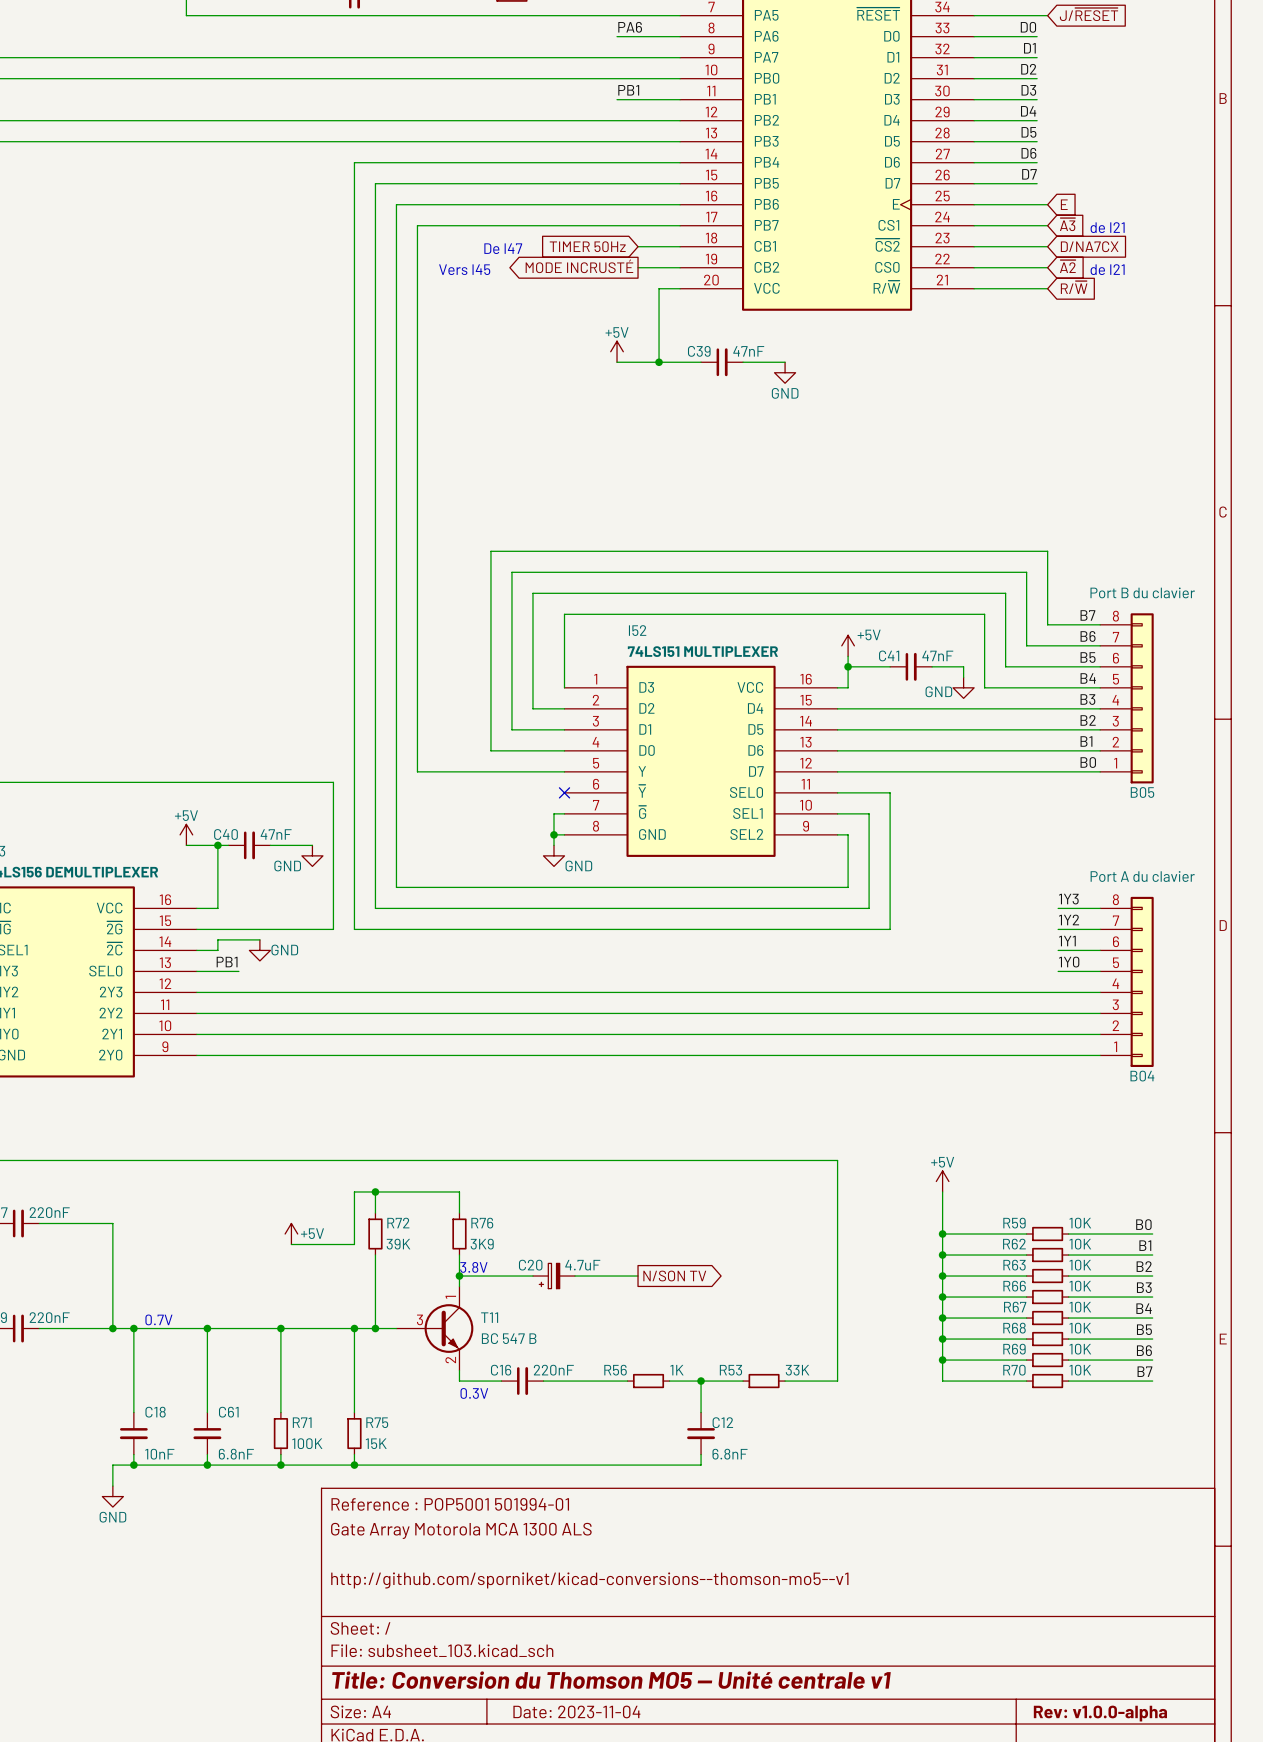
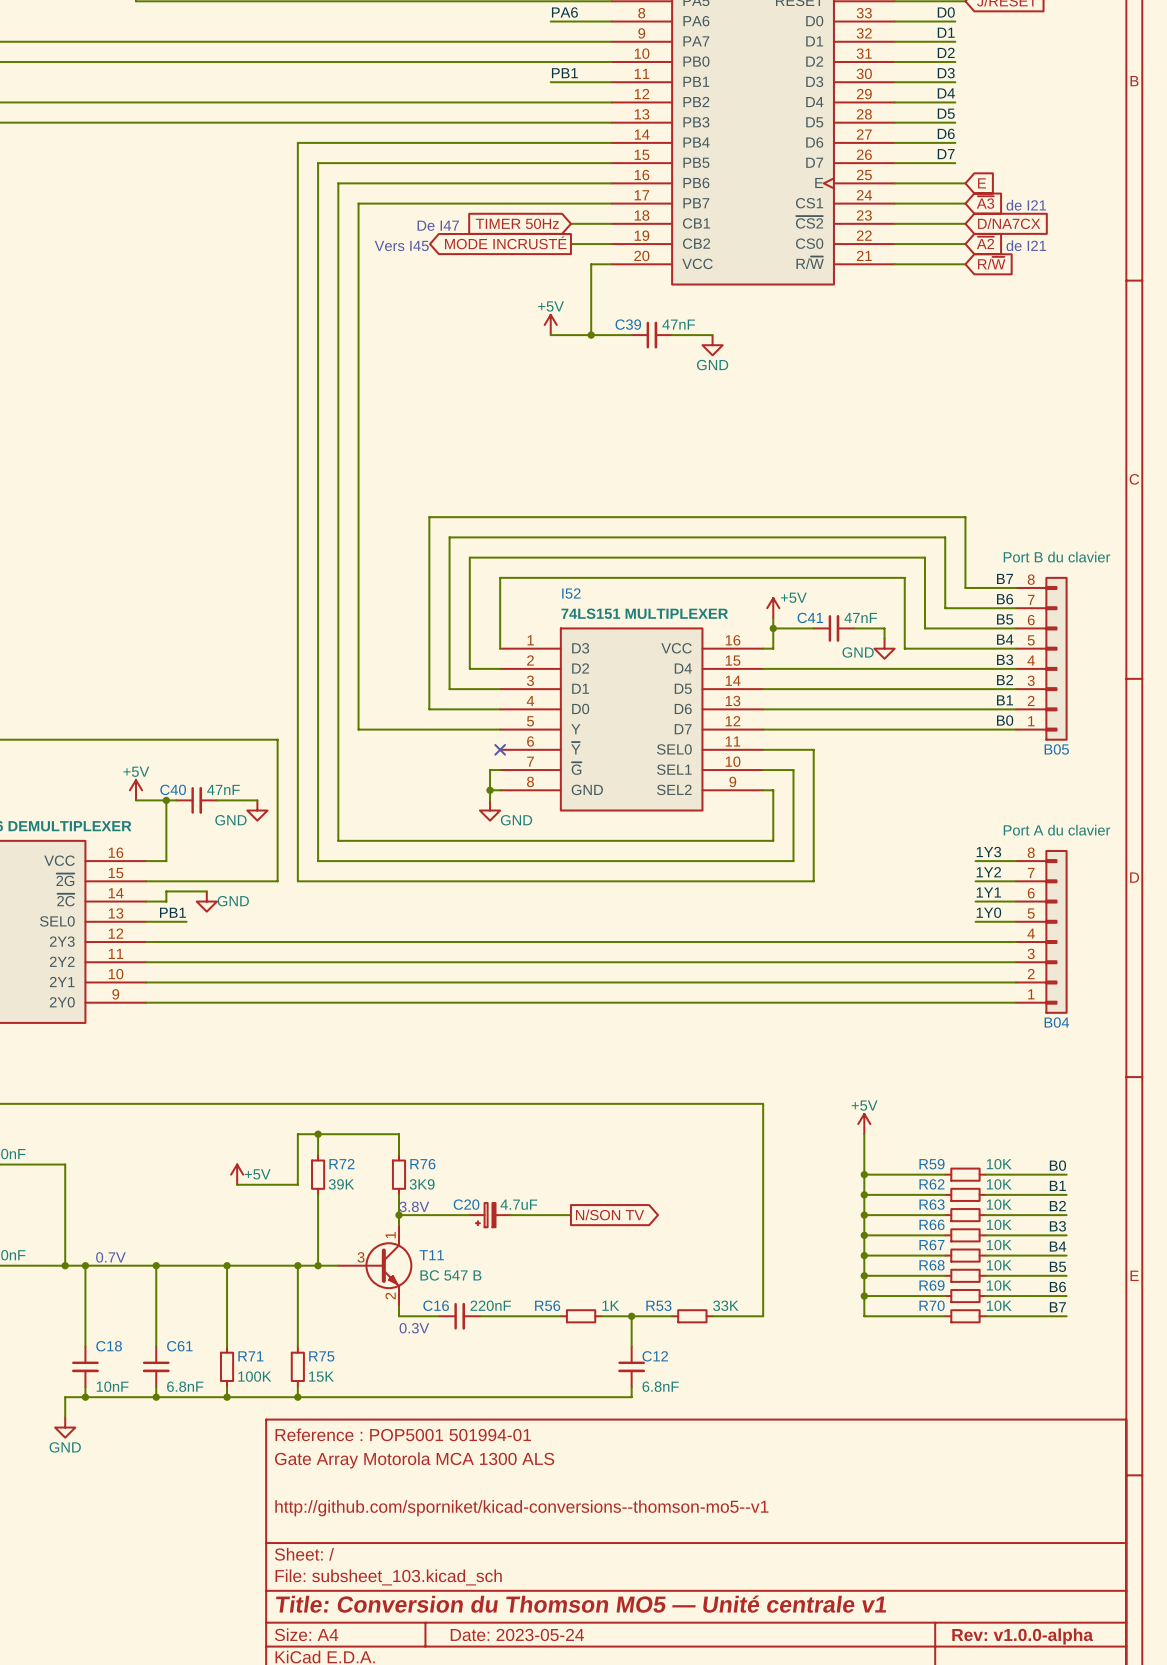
title block: Date: 2023-11-04 (576, 1711) -> Date: 2023-05-24 (517, 1634)

